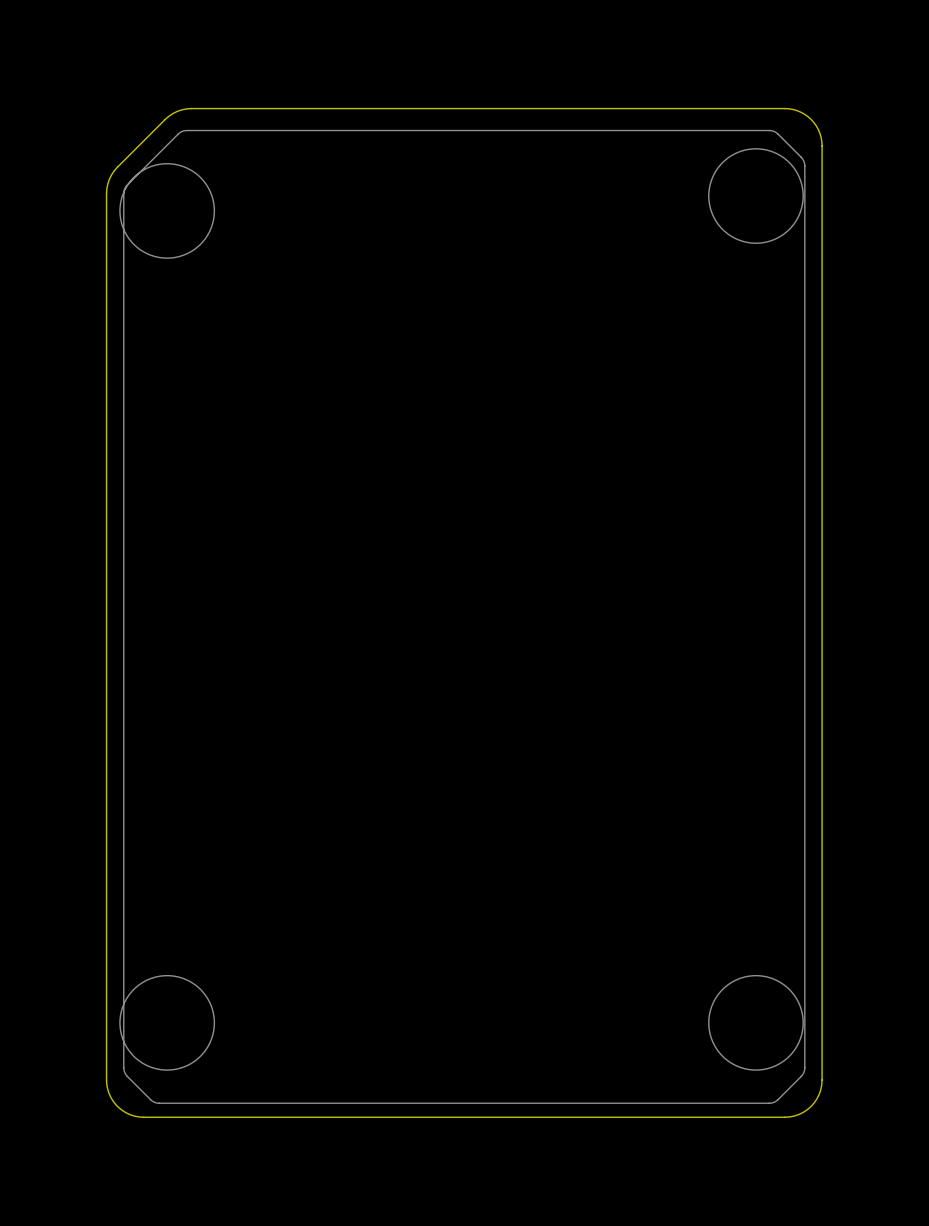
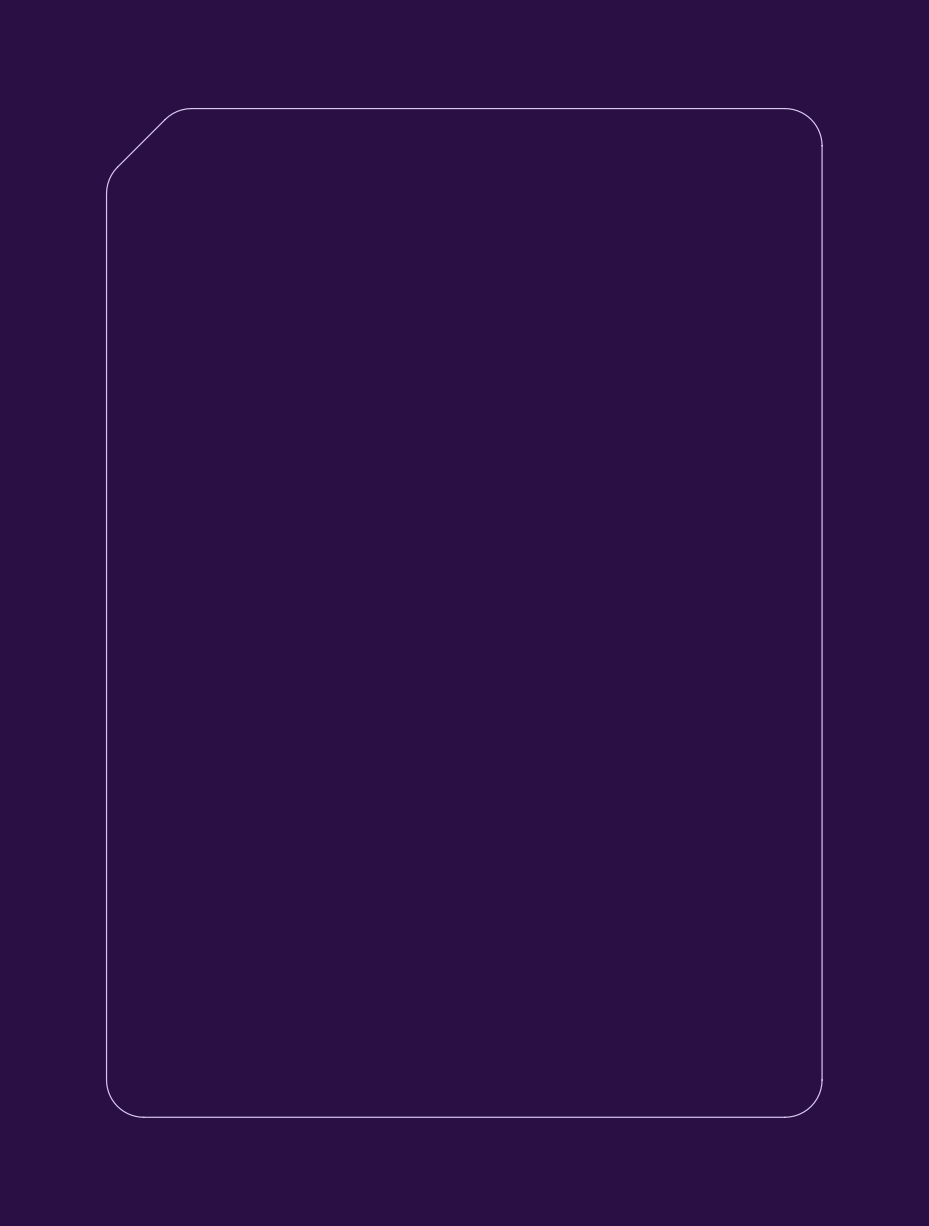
drawing: [708, 148, 804, 244] -> none
drawing: [119, 163, 215, 259] -> none
drawing: [119, 975, 215, 1071] -> none
drawing: [708, 975, 804, 1071] -> none
line: (804, 1067) (804, 1068) (804, 1070) (803, 1072) (801, 1076) (776, 1100) (769, 1103) (159, 1103) (151, 1100) (126, 1075) (123, 1067) (123, 192) (127, 184) (180, 132) (186, 130) (769, 130) (777, 133) (802, 158) (804, 166) (804, 1067) -> none

